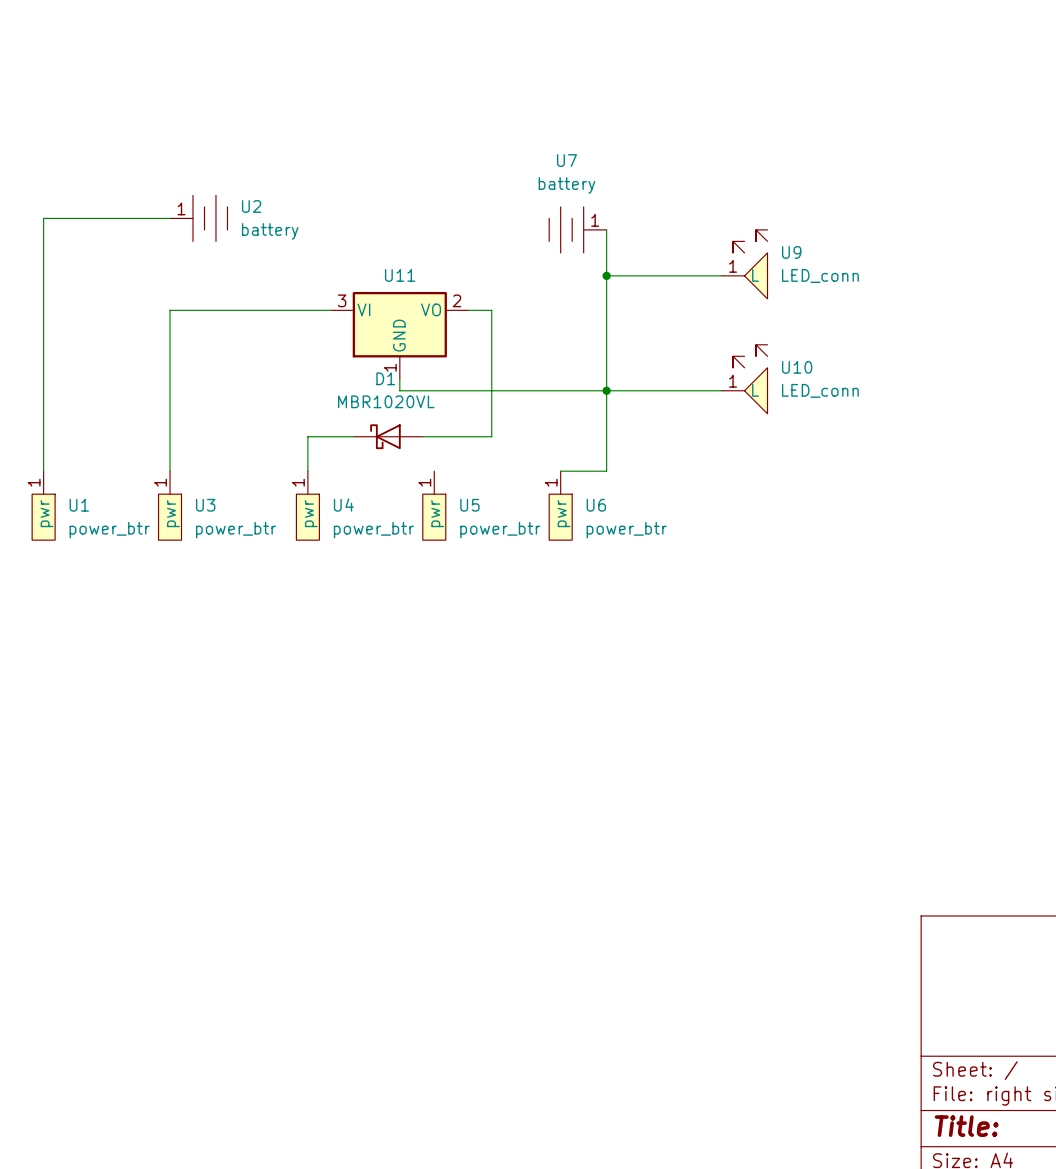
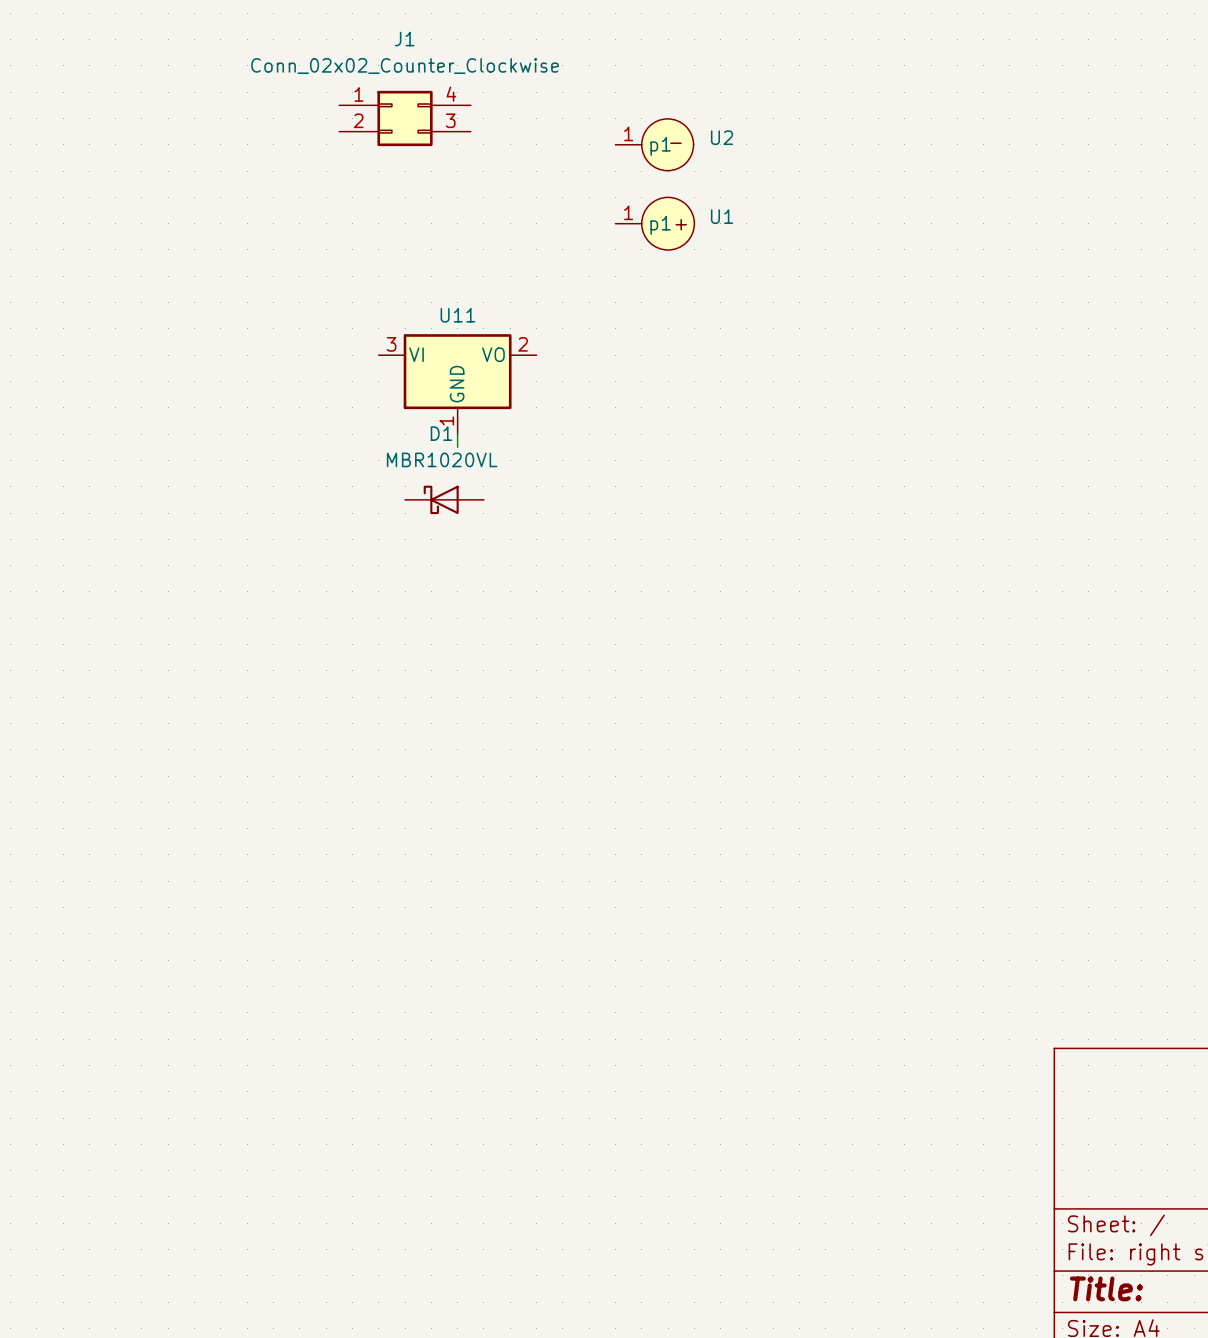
J1: none -> Conn_02x02_Counter_Clockwise (405, 118)
U2 symbol: [170, 195, 228, 242] -> [615, 118, 694, 171]
wire: (170, 218) (43, 218) (43, 471) -> none
U7: battery (577, 229) -> none
wire: (606, 229) (606, 471) (560, 471) -> none
U2 value: battery (270, 231) -> none
U9: LED_conn (744, 264) -> none
wire: (606, 275) (721, 275) -> none
junction: (606, 275) -> none
wire: (330, 310) (170, 310) (170, 471) -> none
wire: (468, 310) (491, 310) (491, 436) (422, 436) -> none
U10: LED_conn (744, 379) -> none
wire: (399, 390) (721, 390) -> none
junction: (606, 390) -> none
wire: (353, 436) (307, 436) (307, 471) -> none
U1 symbol: [32, 471, 56, 541] -> [615, 197, 695, 250]
U1 name position: U1 (79, 505) -> U1 (722, 216)
U3: power_btr (170, 505) -> none
U4: power_btr (307, 505) -> none
U5: power_btr (434, 505) -> none
U6: power_btr (560, 505) -> none
U1 value: power_btr (109, 530) -> none

